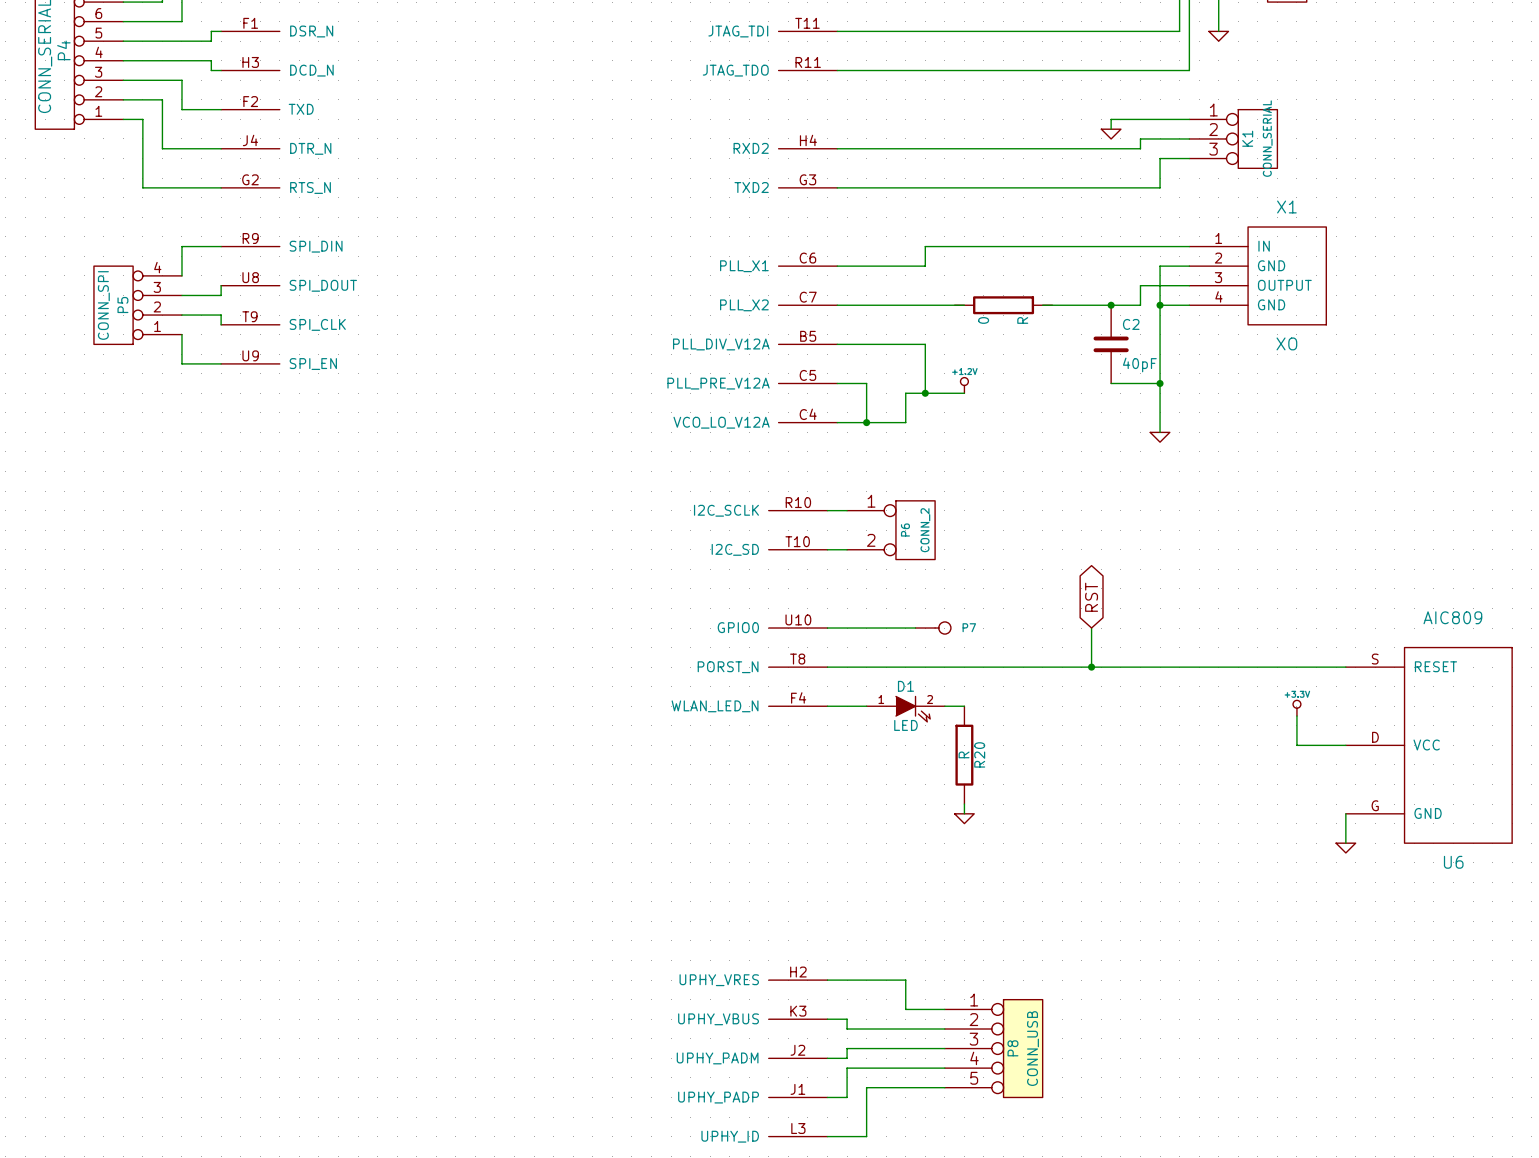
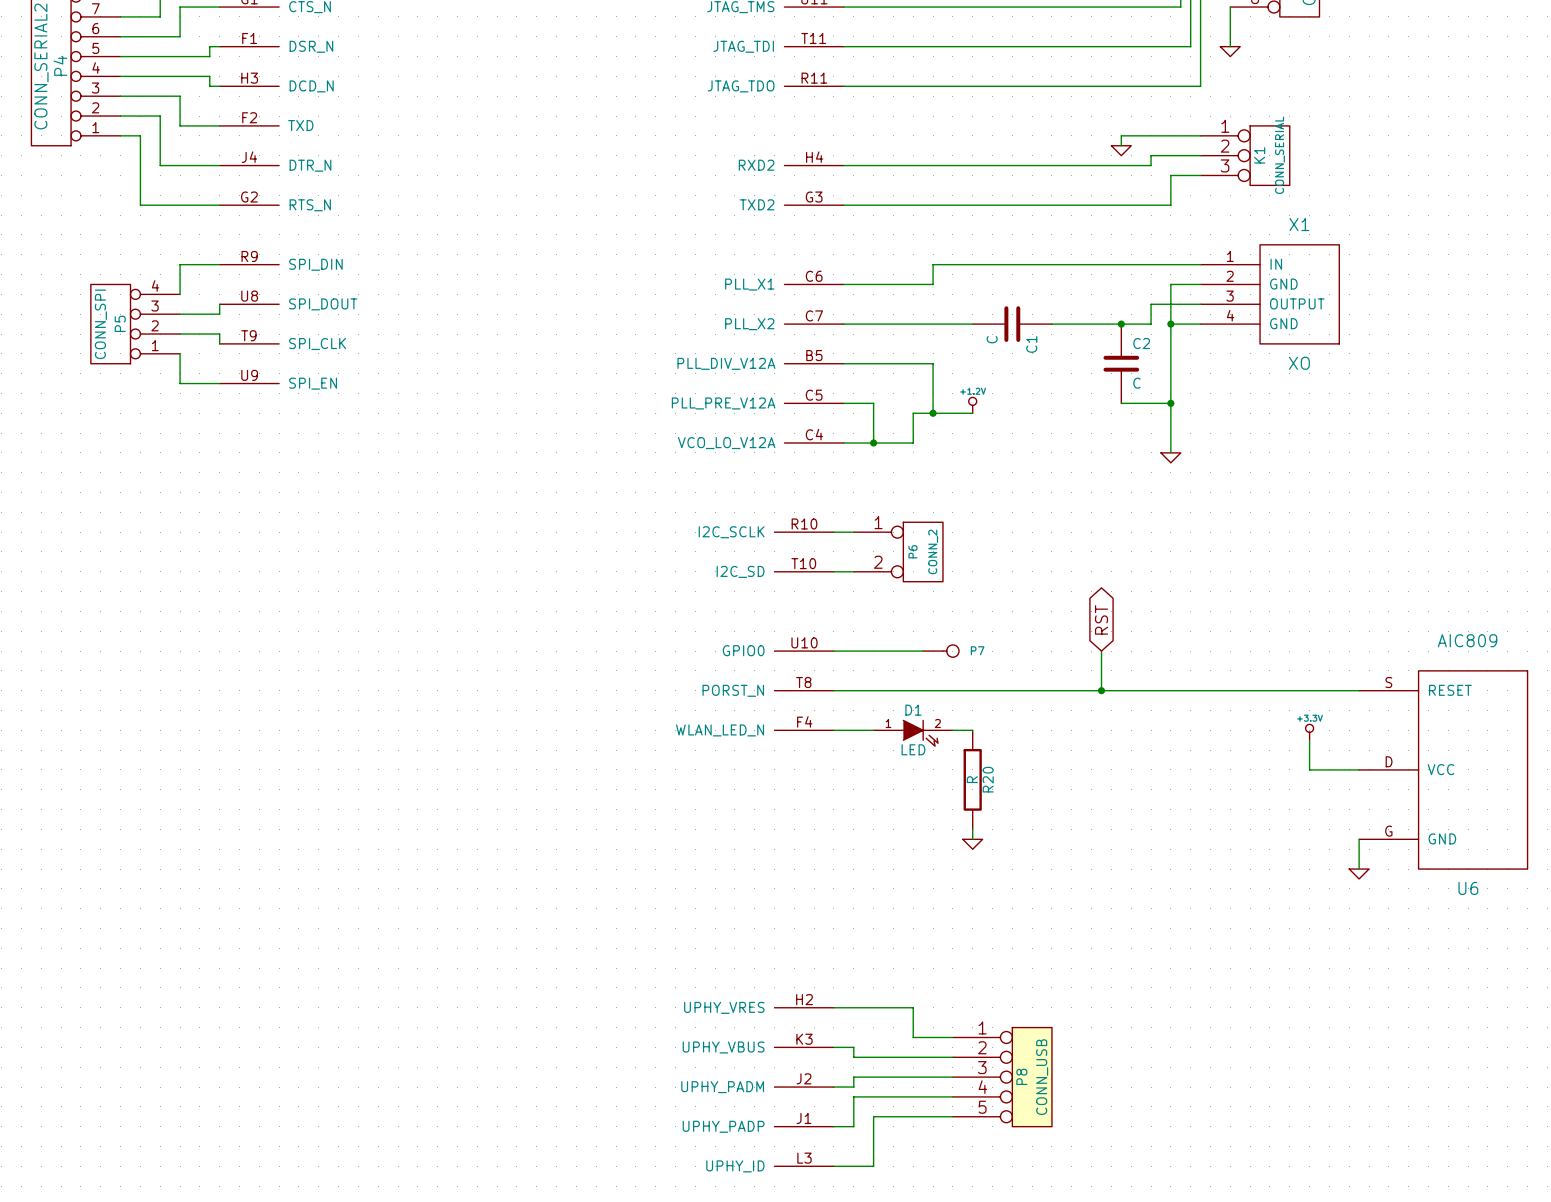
R: 0 (1003, 305) -> none
C1: none -> C (1012, 324)
C2 value: 40pF (1139, 364) -> C (1136, 383)

